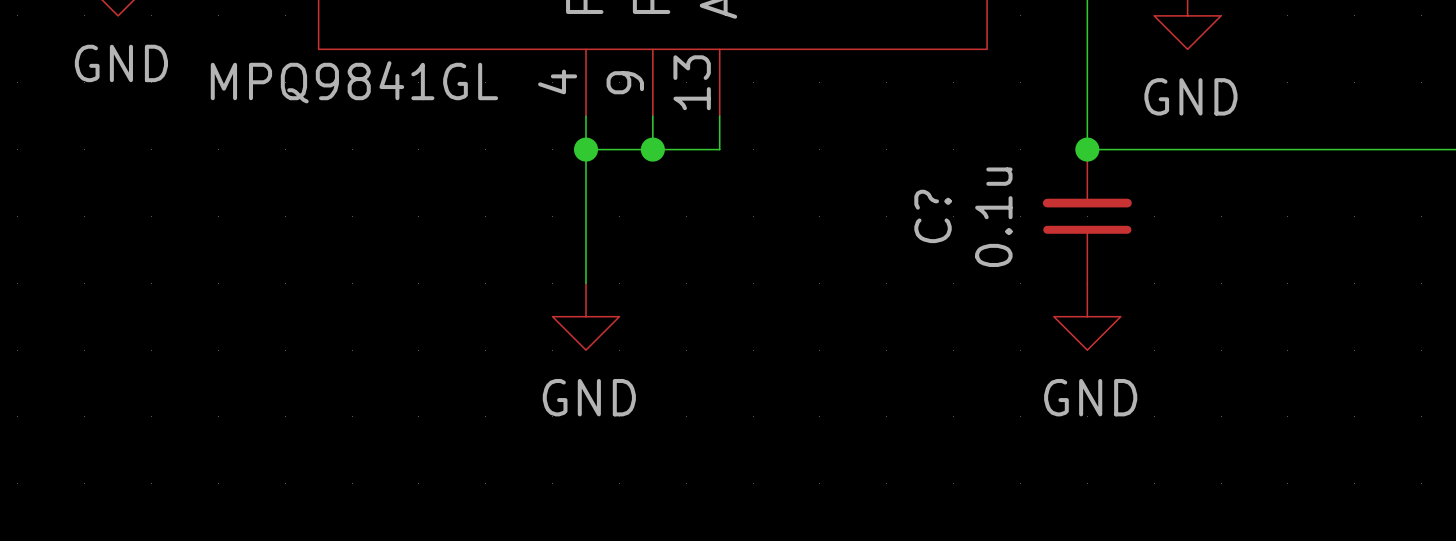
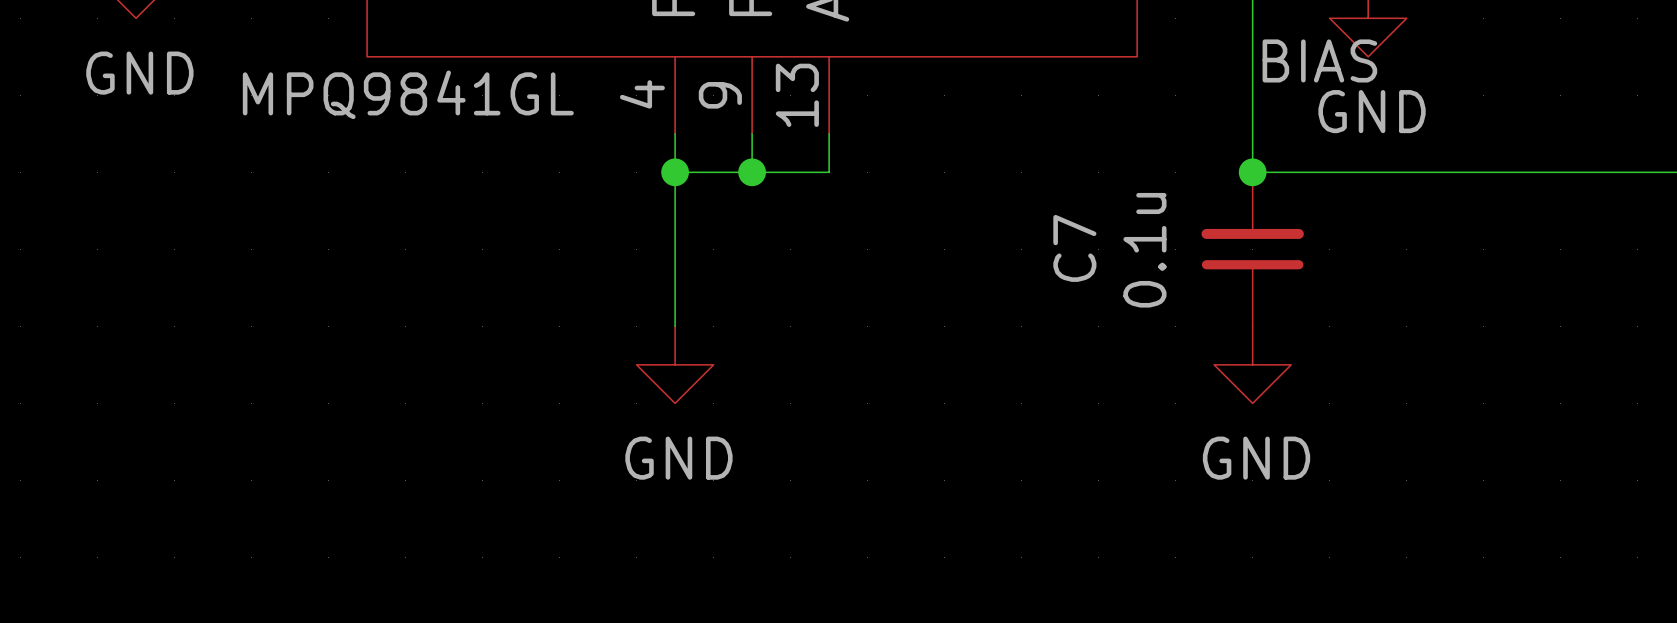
label: none -> BIAS (1319, 60)
C? name: C? (933, 216) -> C7 (1074, 248)

